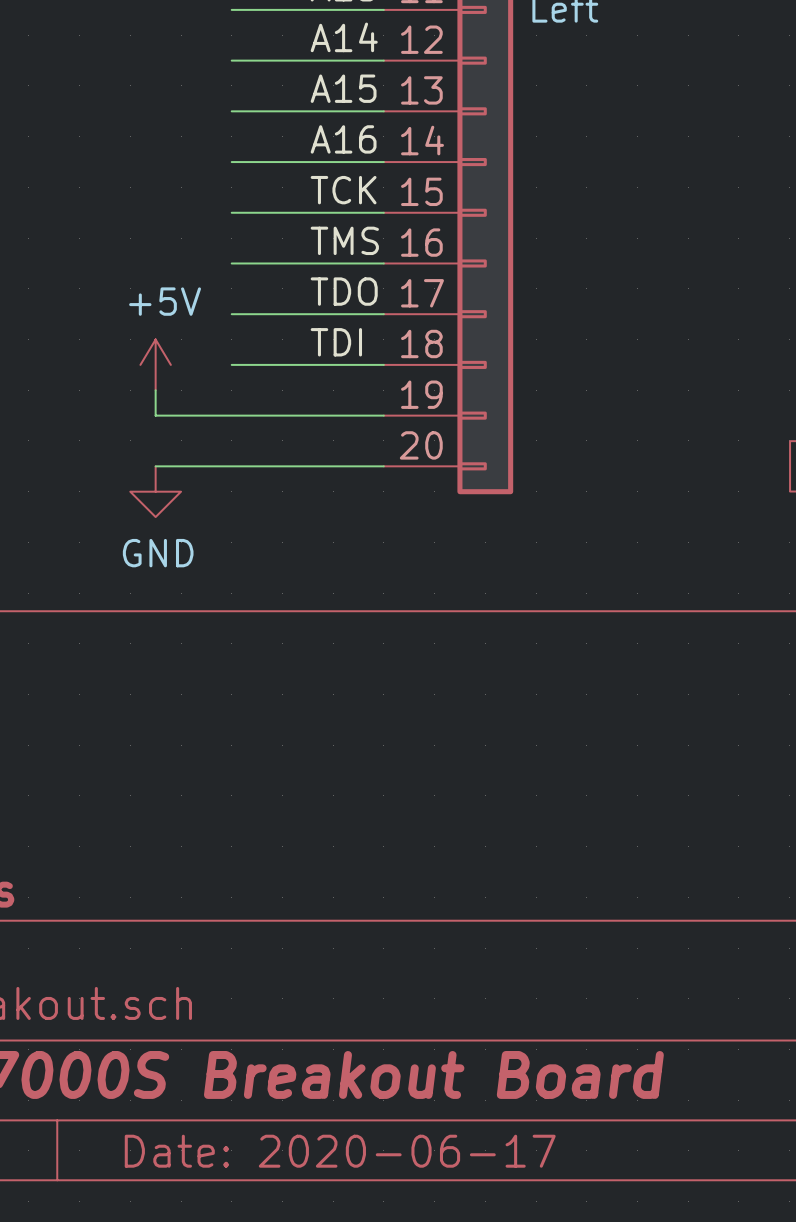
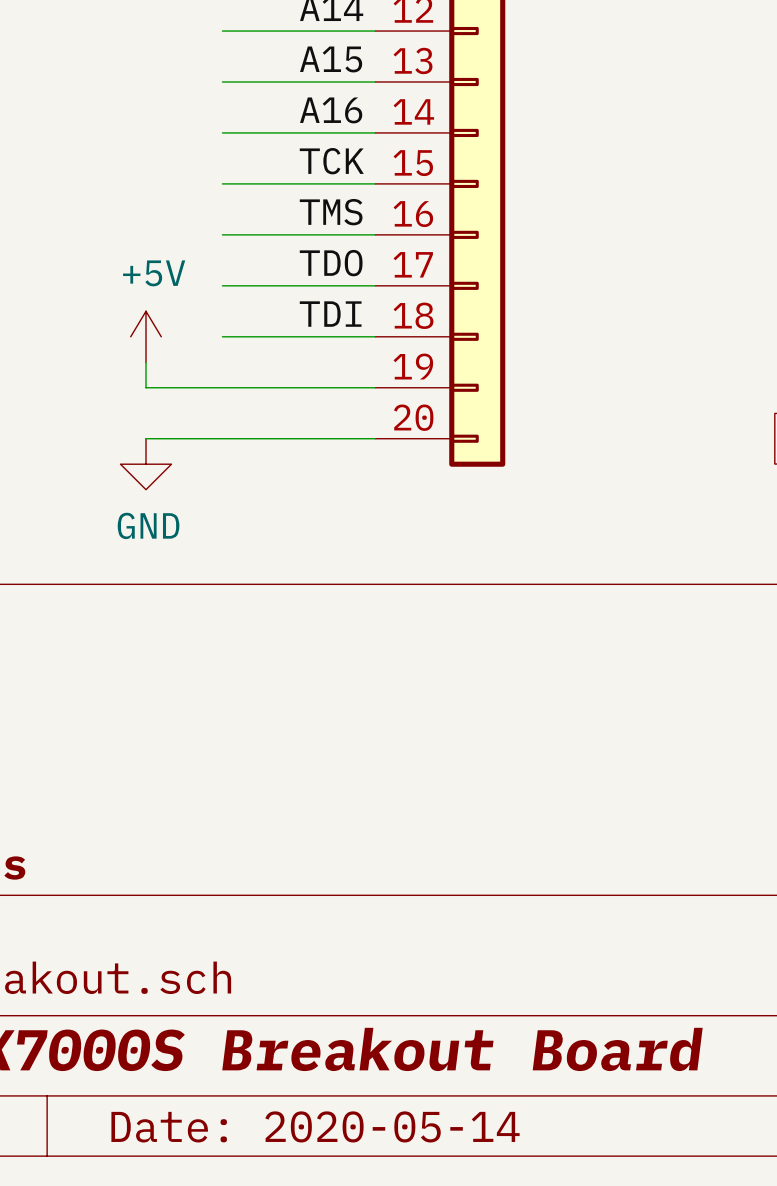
title block: Date: 2020-06-17 (340, 1151) -> Date: 2020-05-14 (315, 1126)

